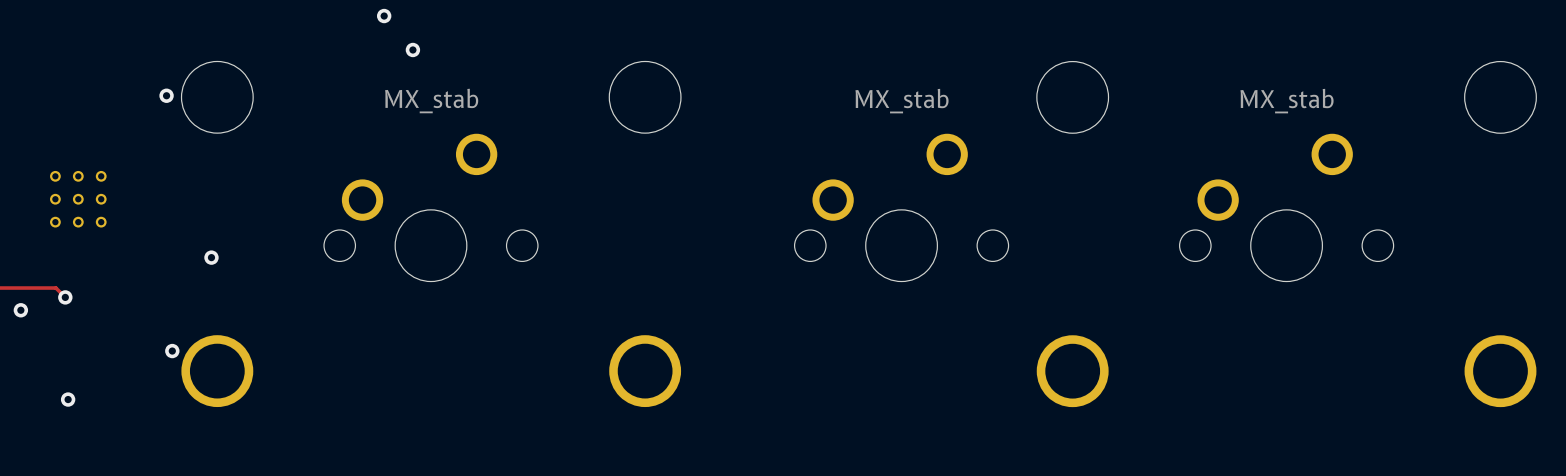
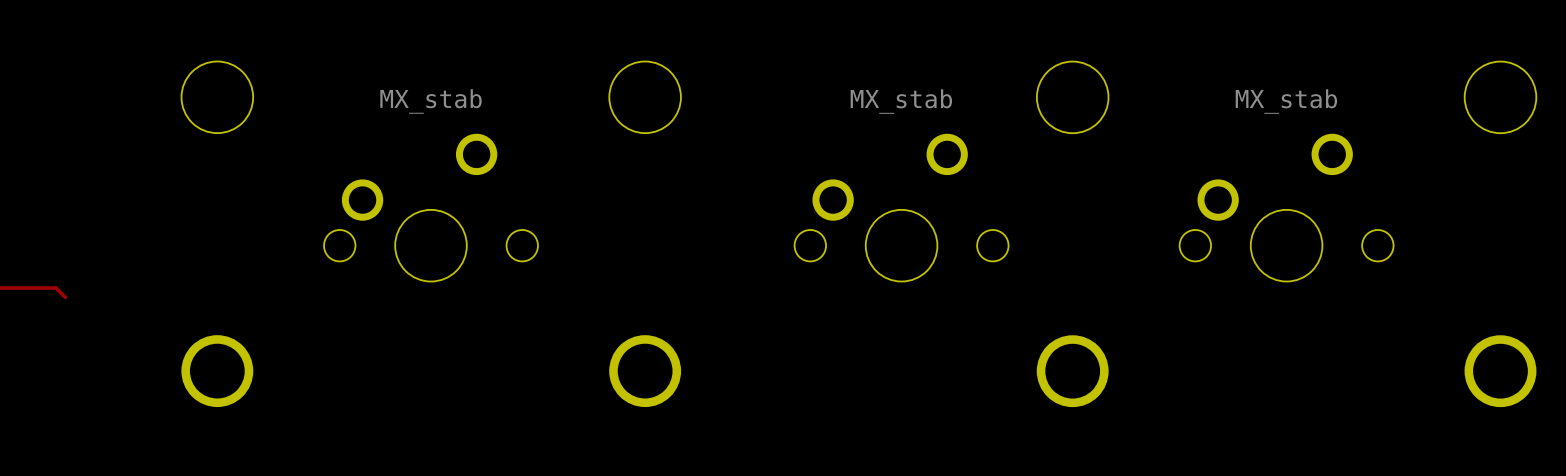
via: (384, 16) -> none
via: (412, 49) -> none
via: (166, 95) -> none
part: (78, 199) -> none
via: (211, 257) -> none
via: (65, 297) -> none
via: (20, 310) -> none
via: (172, 351) -> none
via: (68, 399) -> none

